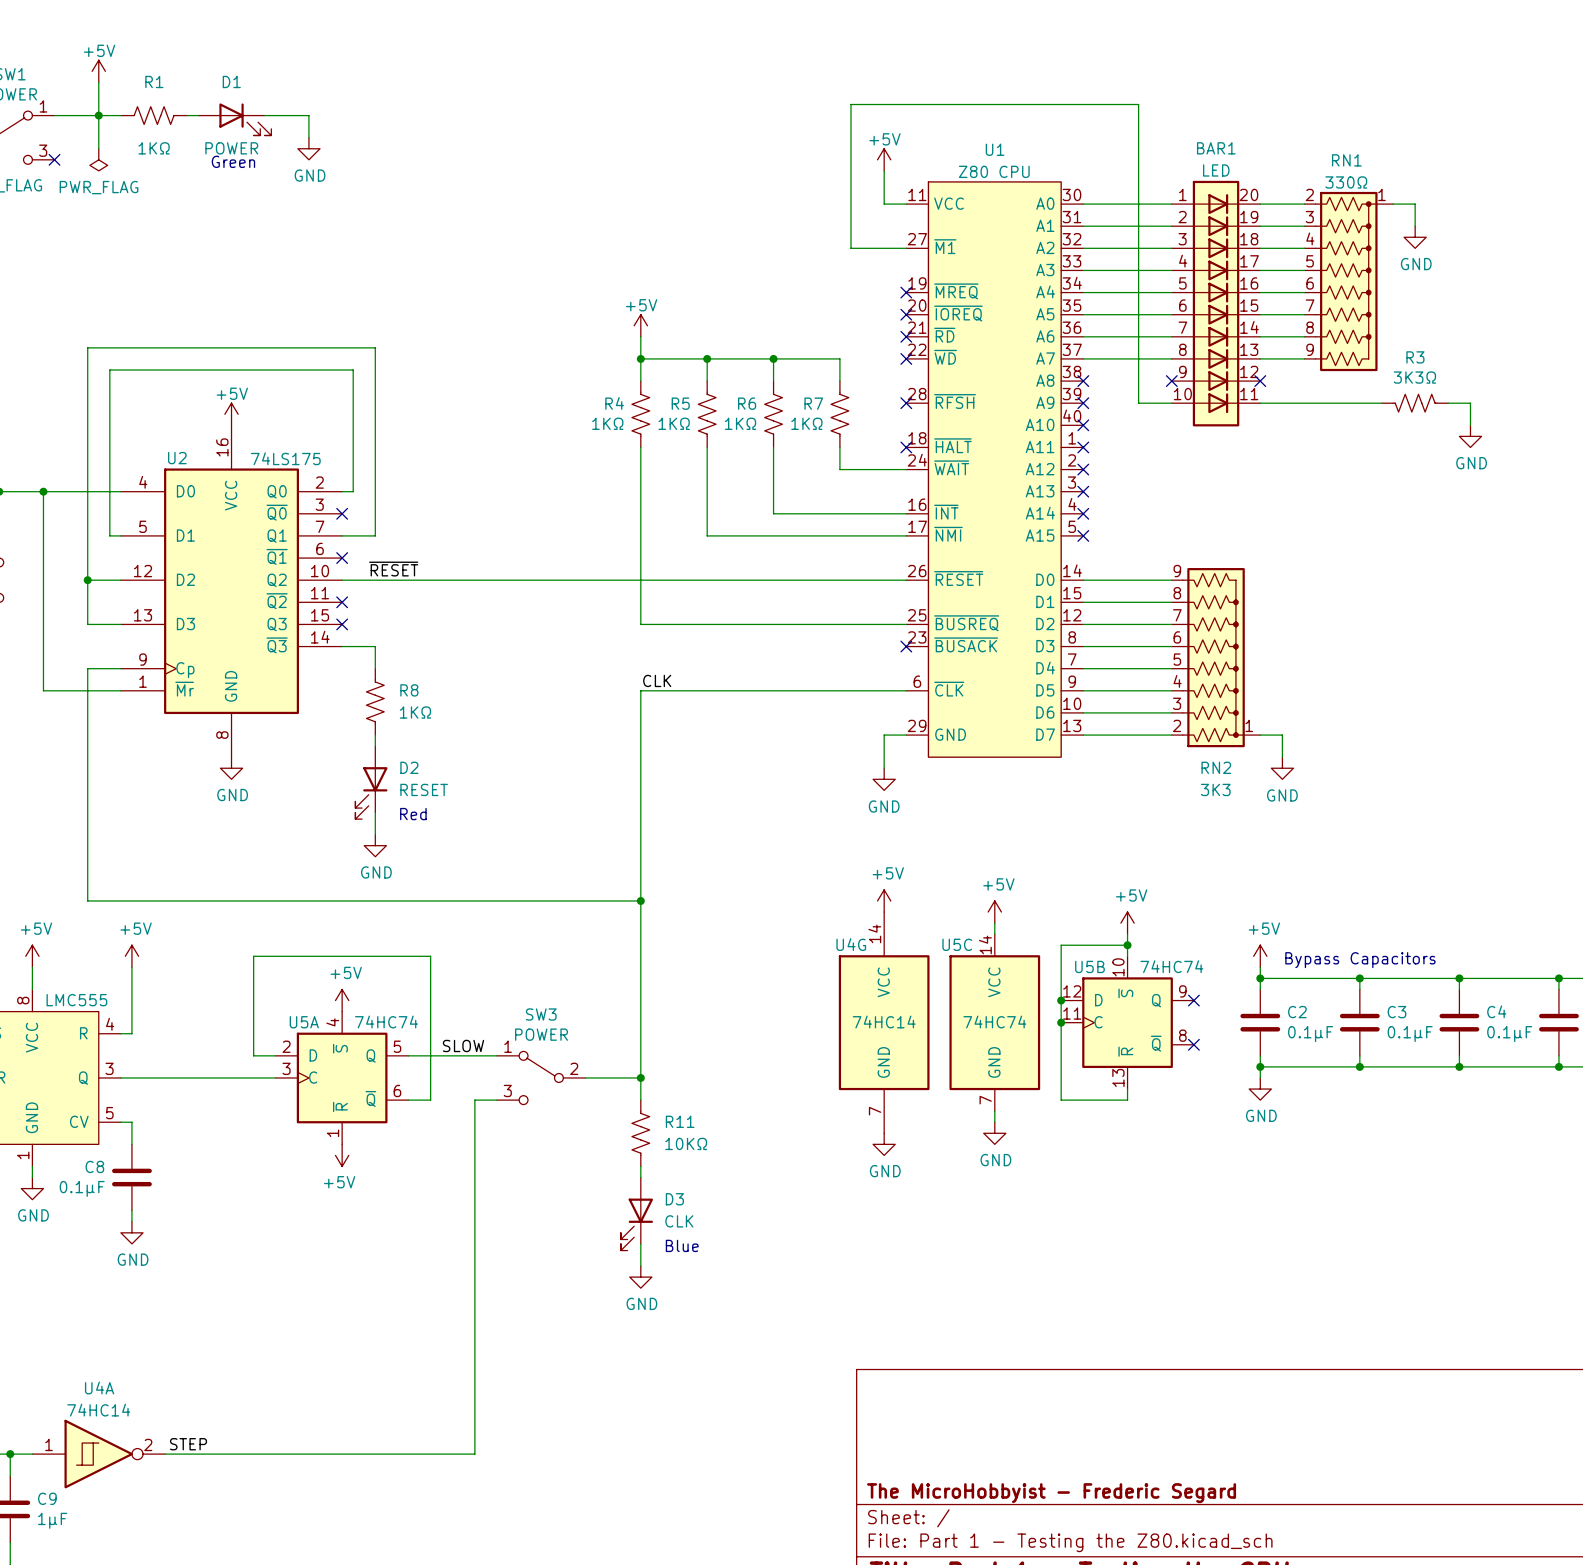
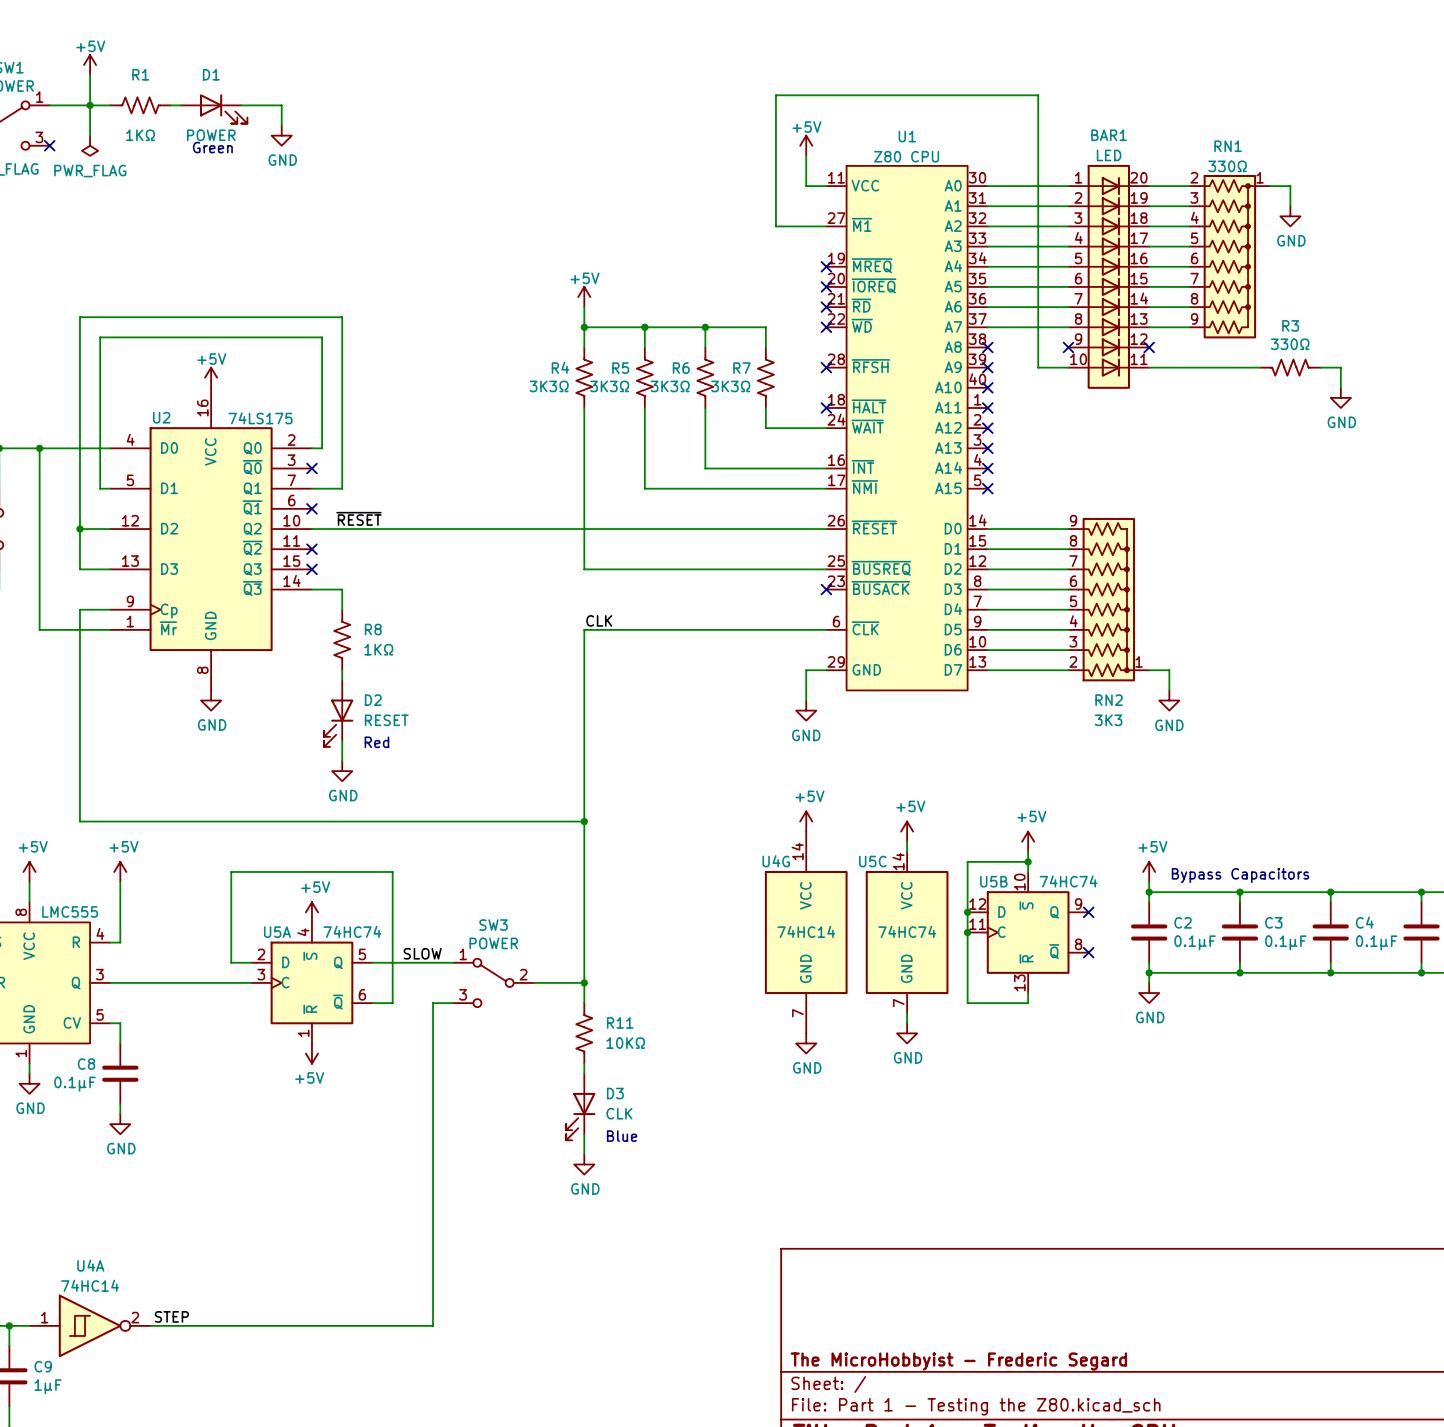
R3 value: 3K3Ω (1414, 377) -> 330Ω (1290, 344)
R4 value: 1KΩ (607, 423) -> 3K3Ω (549, 386)
R5 value: 1KΩ (674, 423) -> 3K3Ω (609, 386)
R6 value: 1KΩ (740, 423) -> 3K3Ω (670, 386)
R7 value: 1KΩ (806, 423) -> 3K3Ω (730, 386)

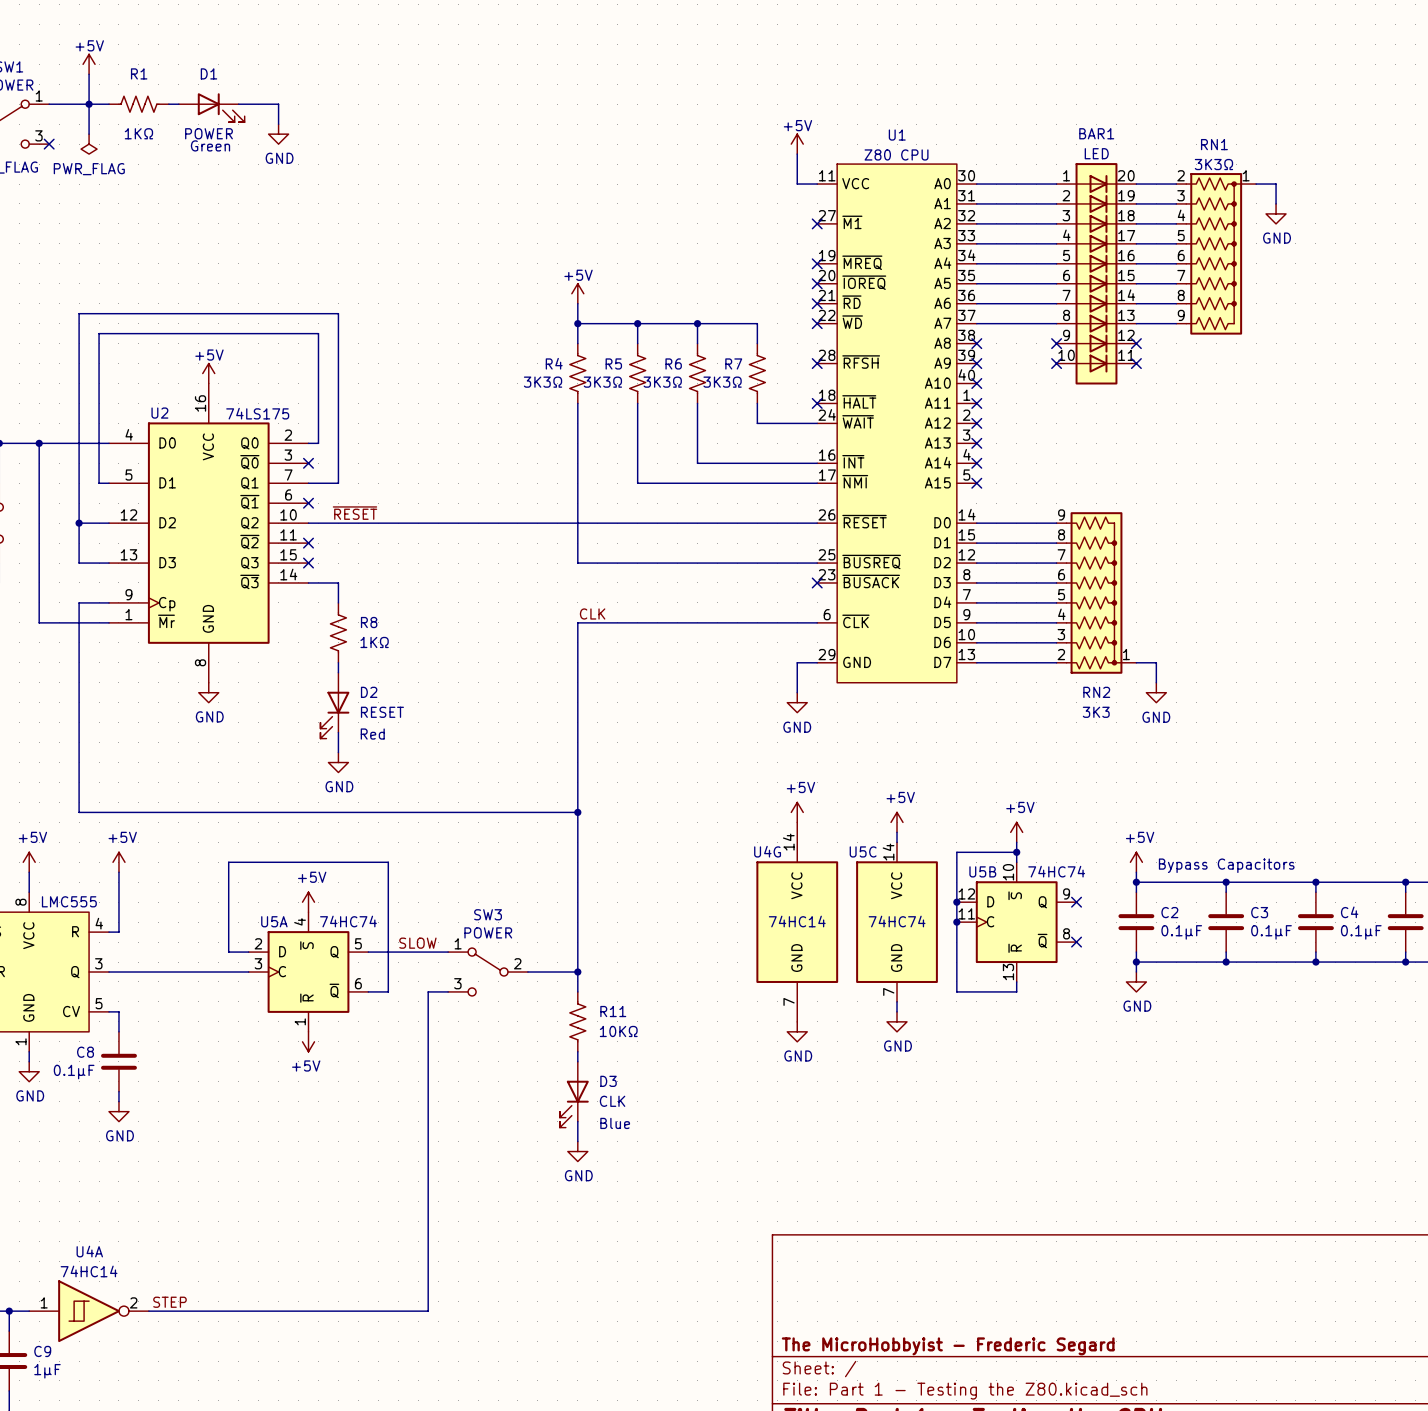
RN1 value: 330Ω (1227, 166) -> 3K3Ω (1213, 164)
wire: (826, 226) (775, 226) (775, 95) (1038, 95) (1038, 367) (1068, 367) -> none
no-connect mark: none -> (817, 223)
no-connect mark: none -> (1056, 363)
wire: (1149, 367) (1260, 367) -> none
no-connect mark: none -> (1136, 363)
R3: 330Ω (1290, 367) -> none
wire: (1320, 367) (1340, 367) (1340, 387) -> none
power symbol: GND (1340, 397) -> none

